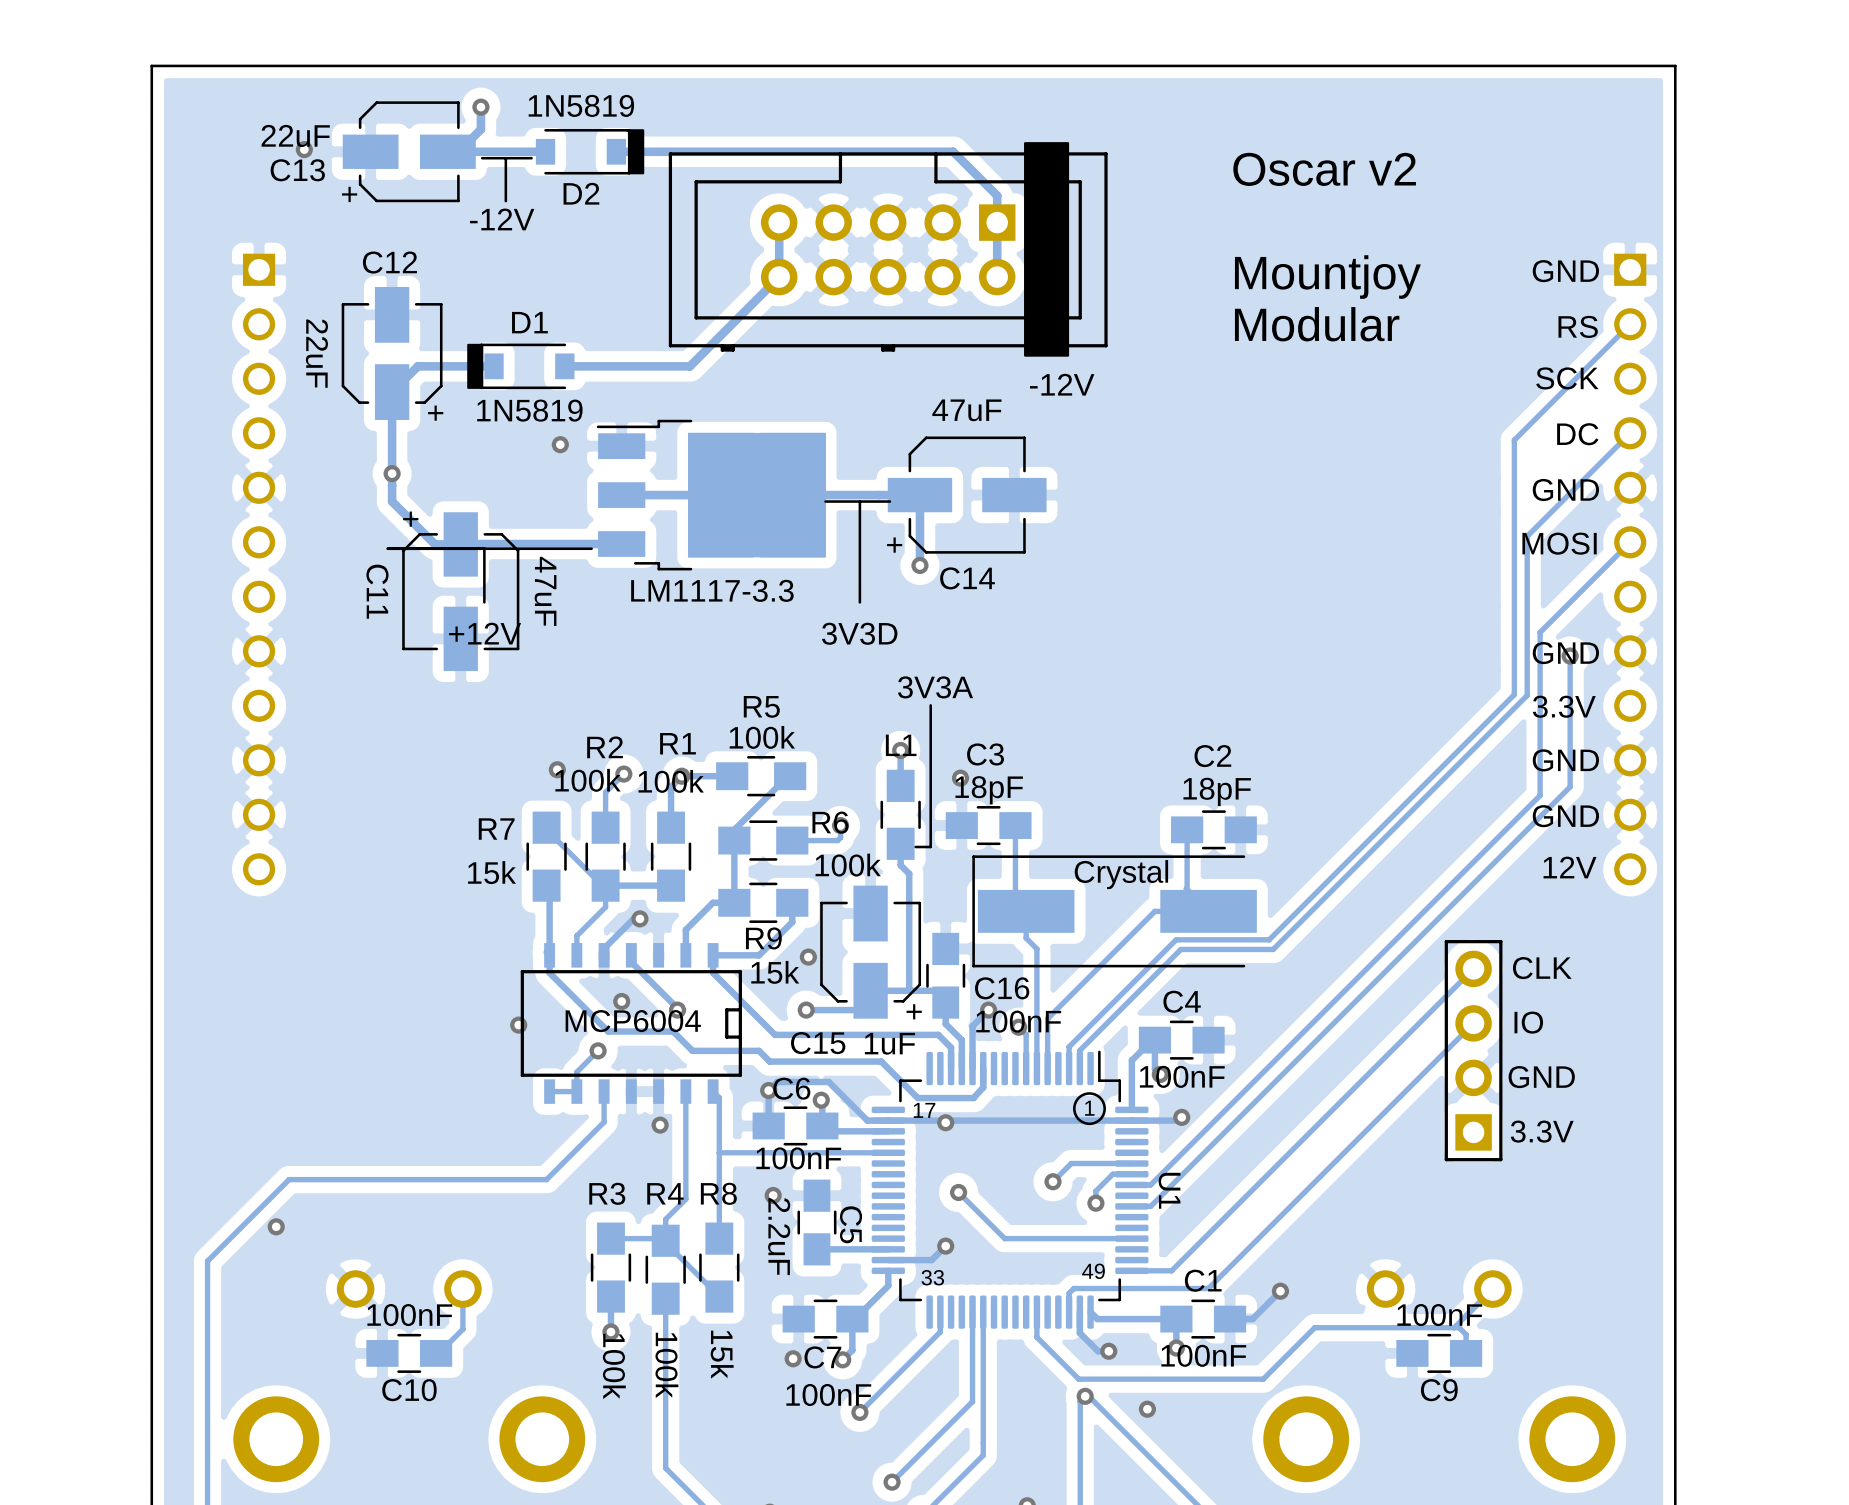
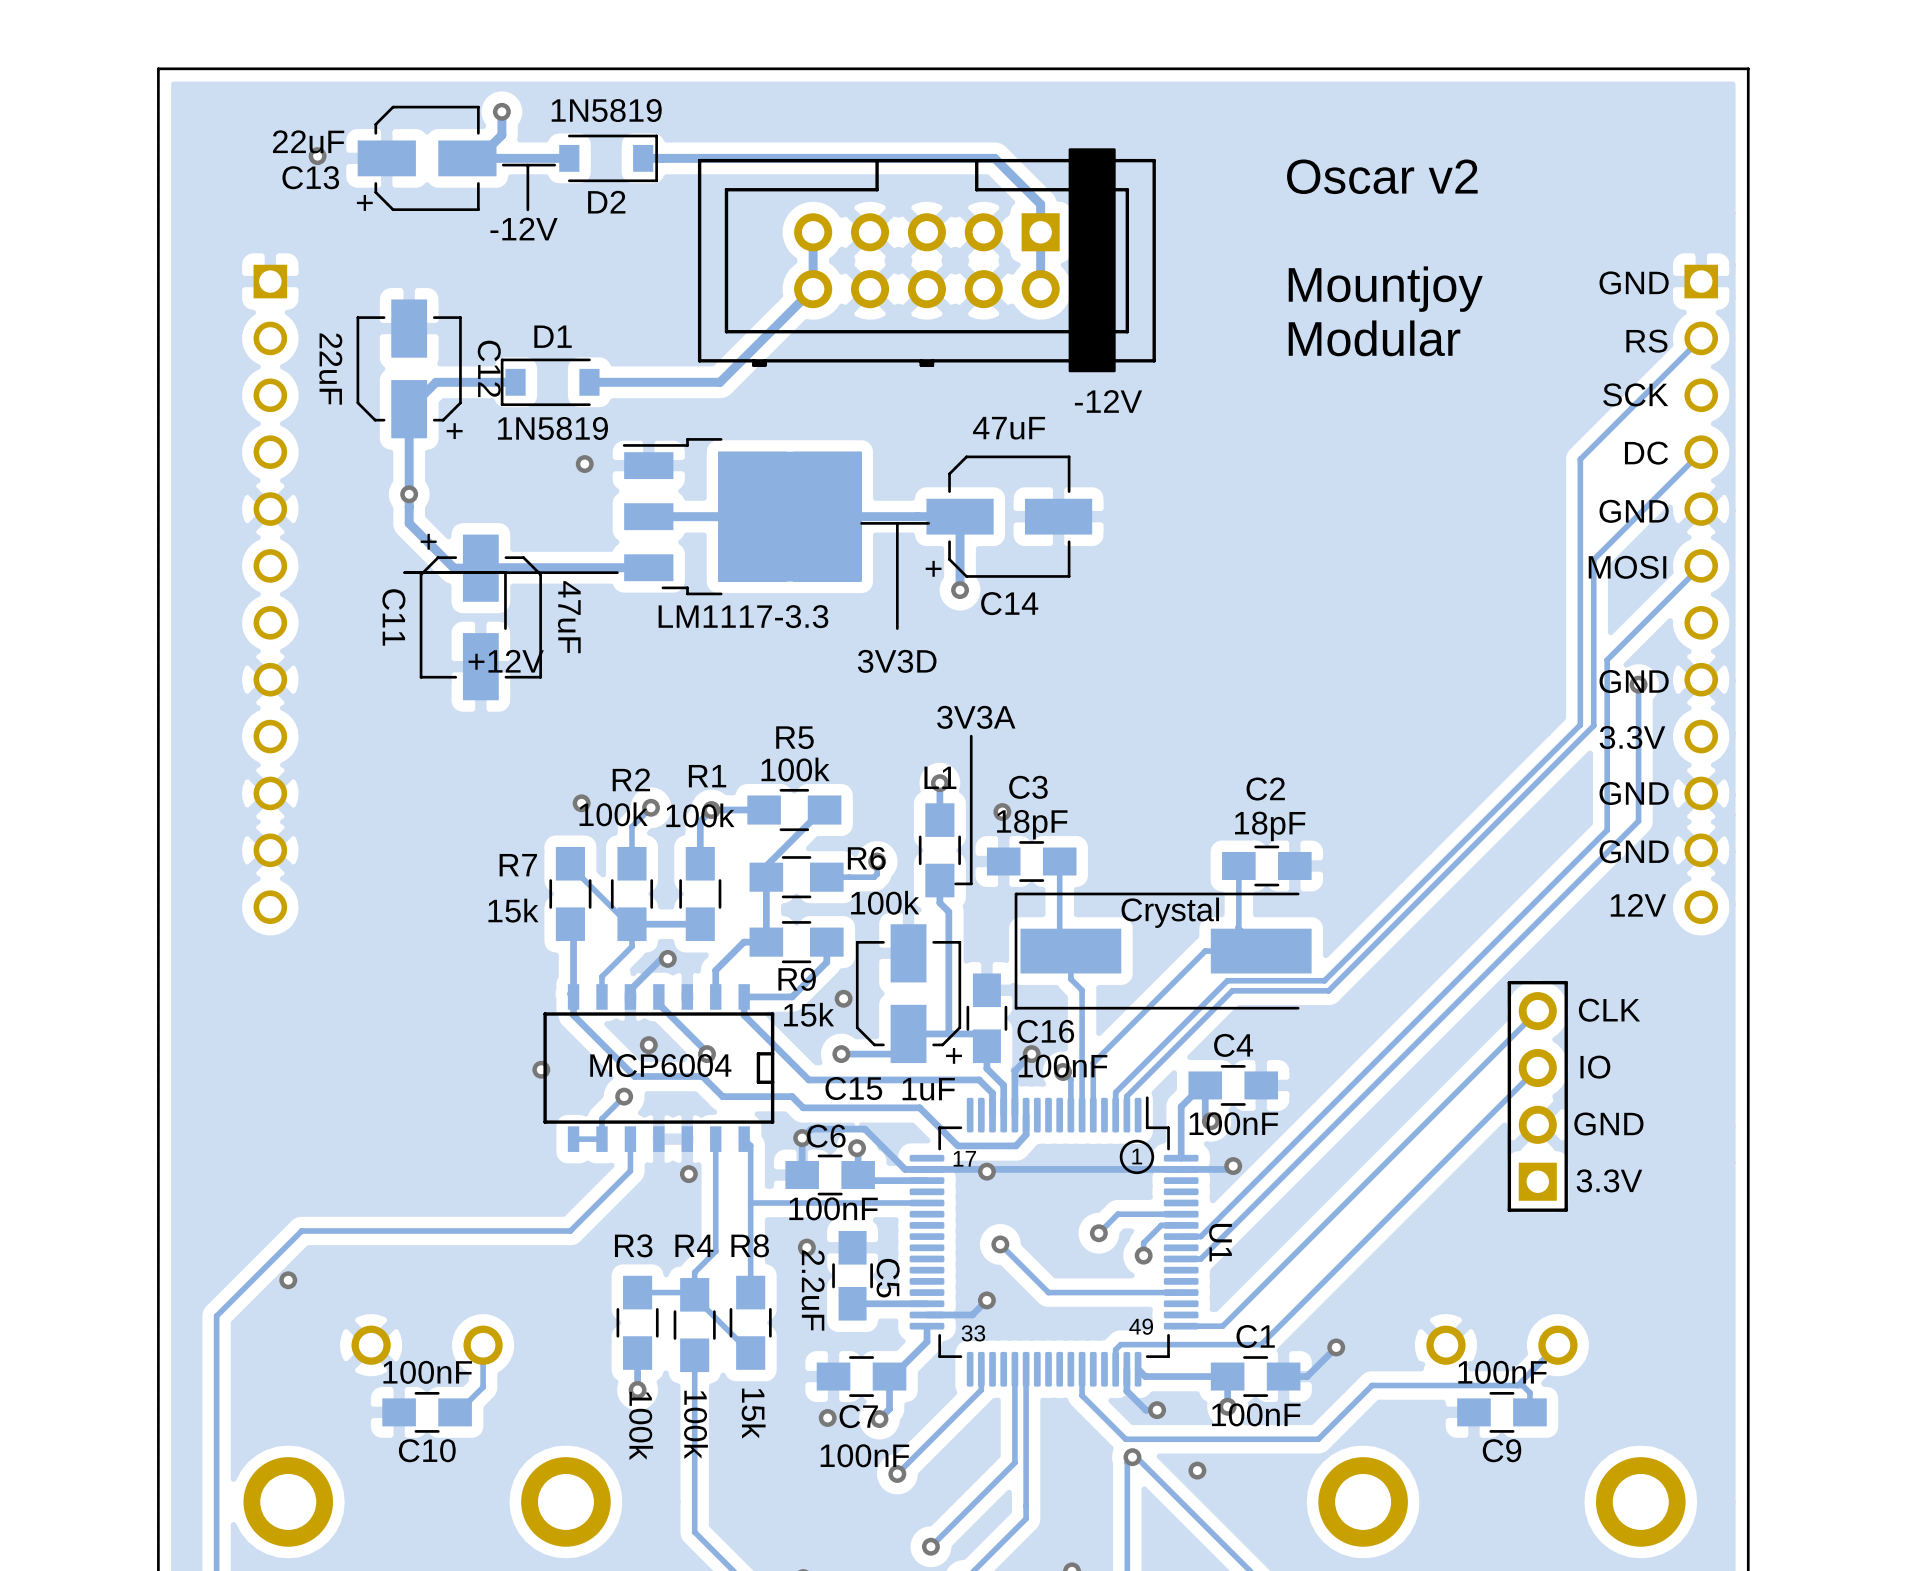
drawing: [625, 129, 645, 175] -> none
C12 name rotation: 0° (389, 262) -> 90° clockwise (489, 368)
C12 name position: C12 (389, 262) -> C12 (489, 368)
drawing: [467, 343, 484, 389] -> none

